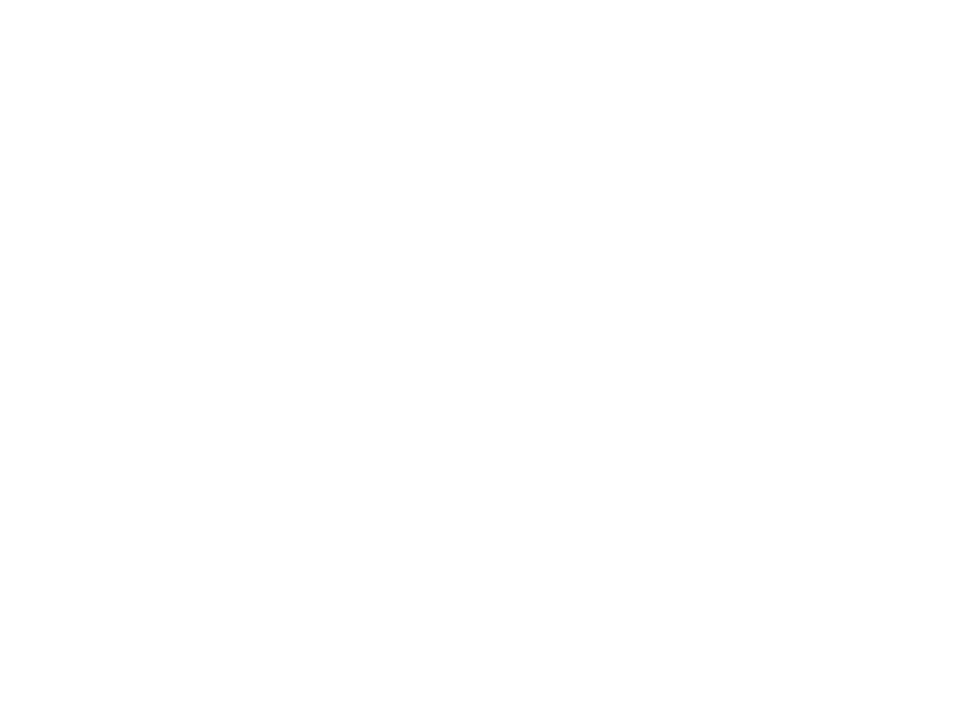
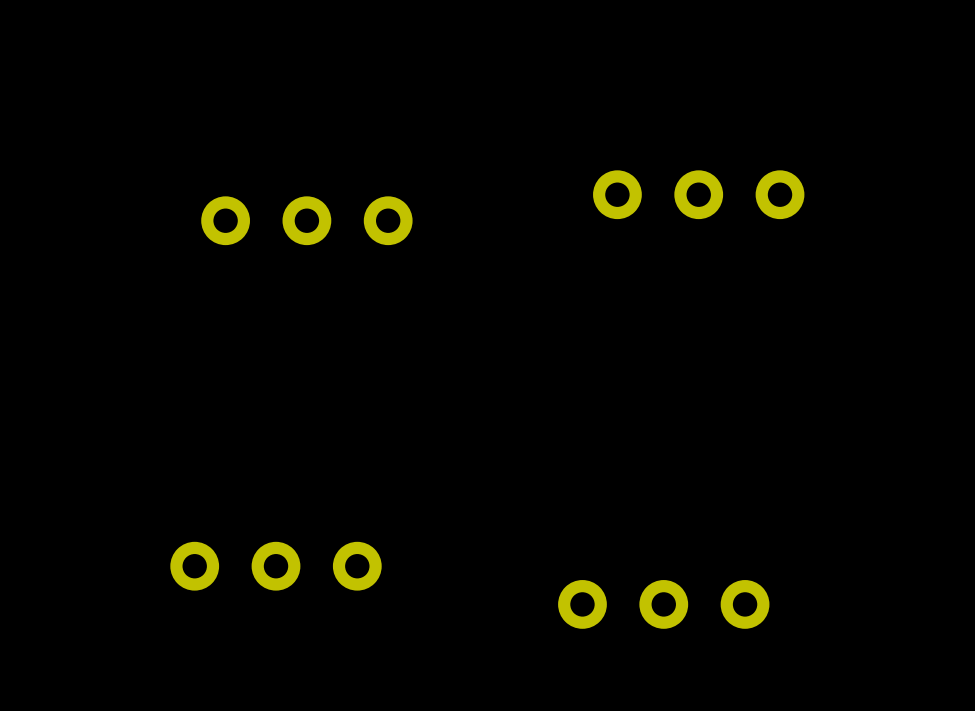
part: none -> (698, 194)
part: none -> (306, 220)
part: none -> (276, 566)
part: none -> (663, 604)

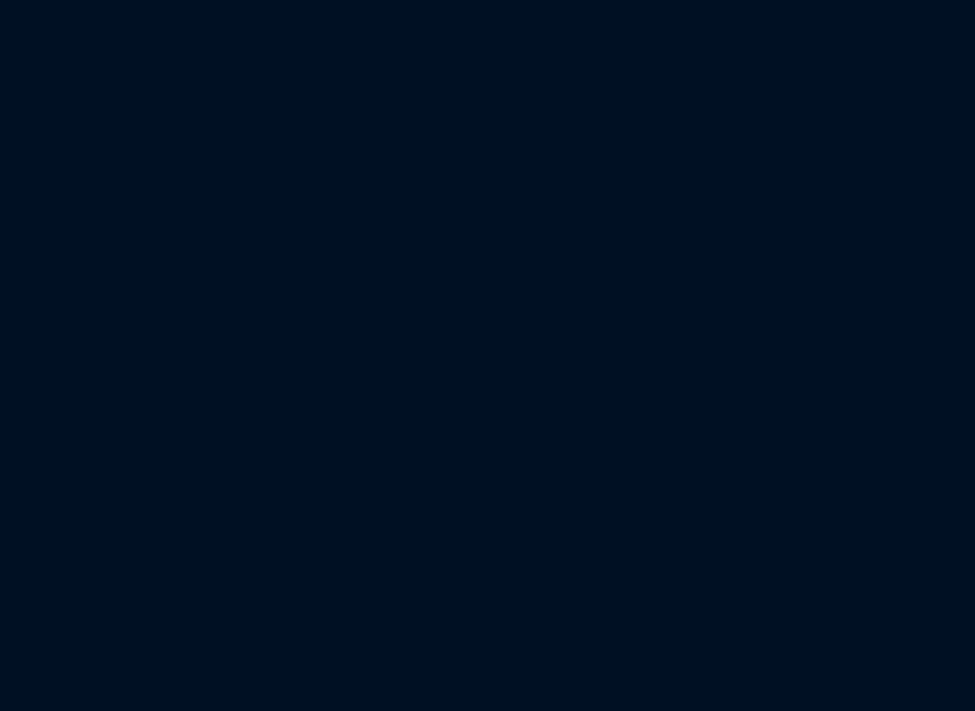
part: (698, 194) -> none
part: (306, 220) -> none
part: (276, 566) -> none
part: (663, 604) -> none

